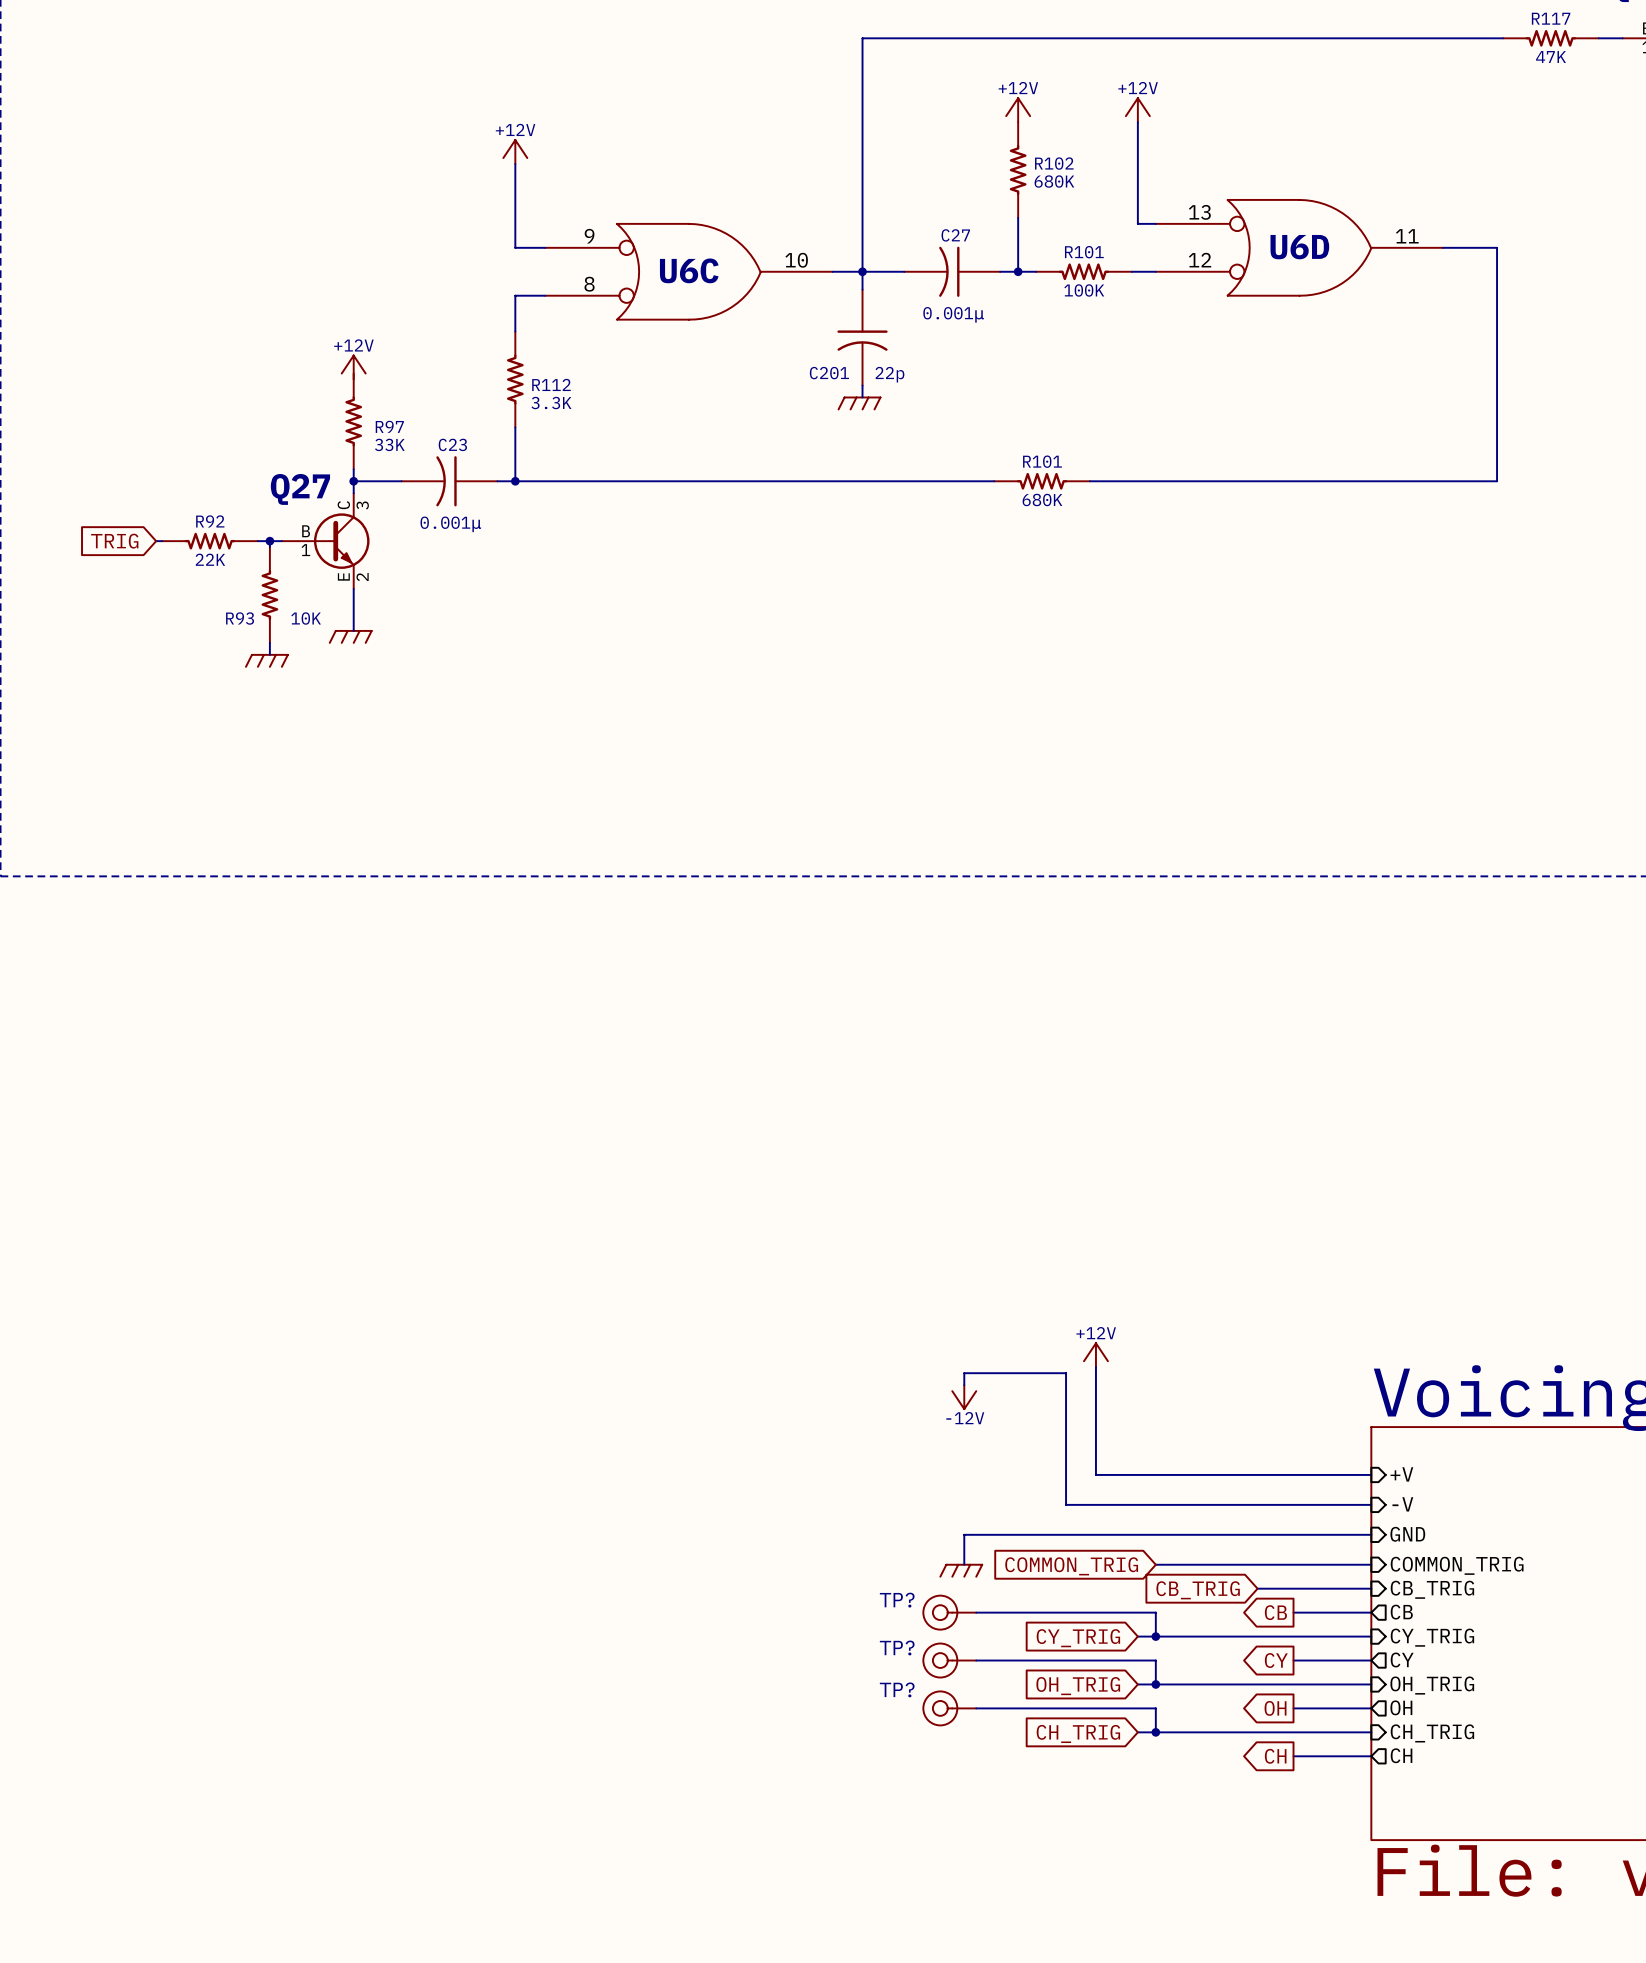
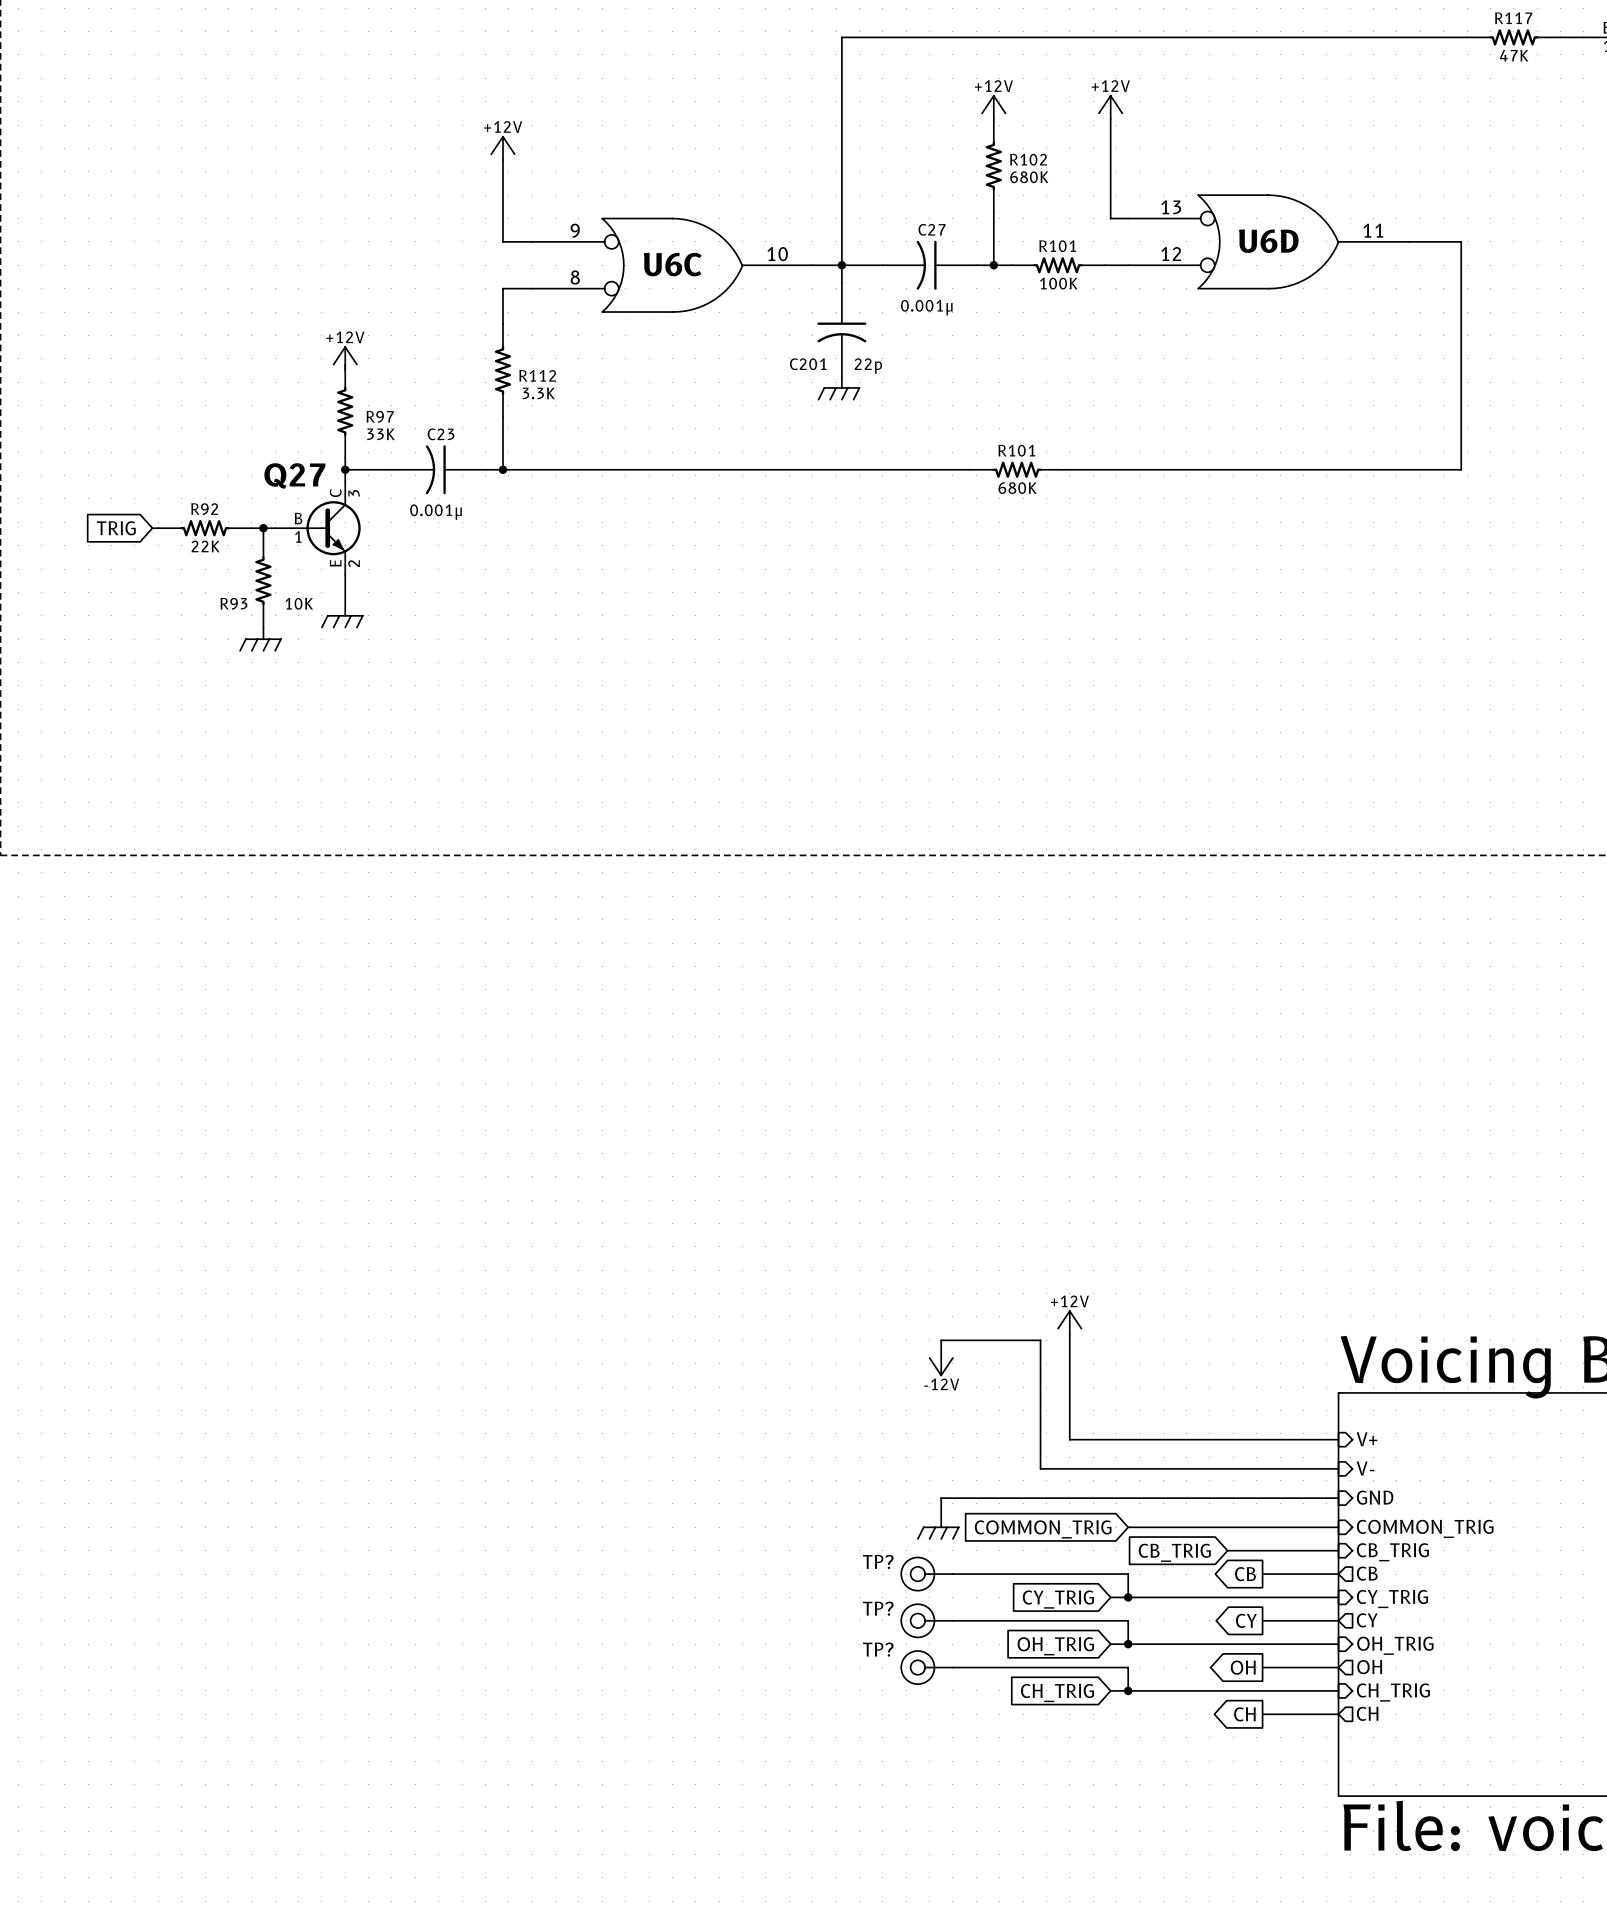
sheet pin: +V (1401, 1474) -> V+ (1366, 1439)
sheet pin: -V (1402, 1504) -> V- (1365, 1468)

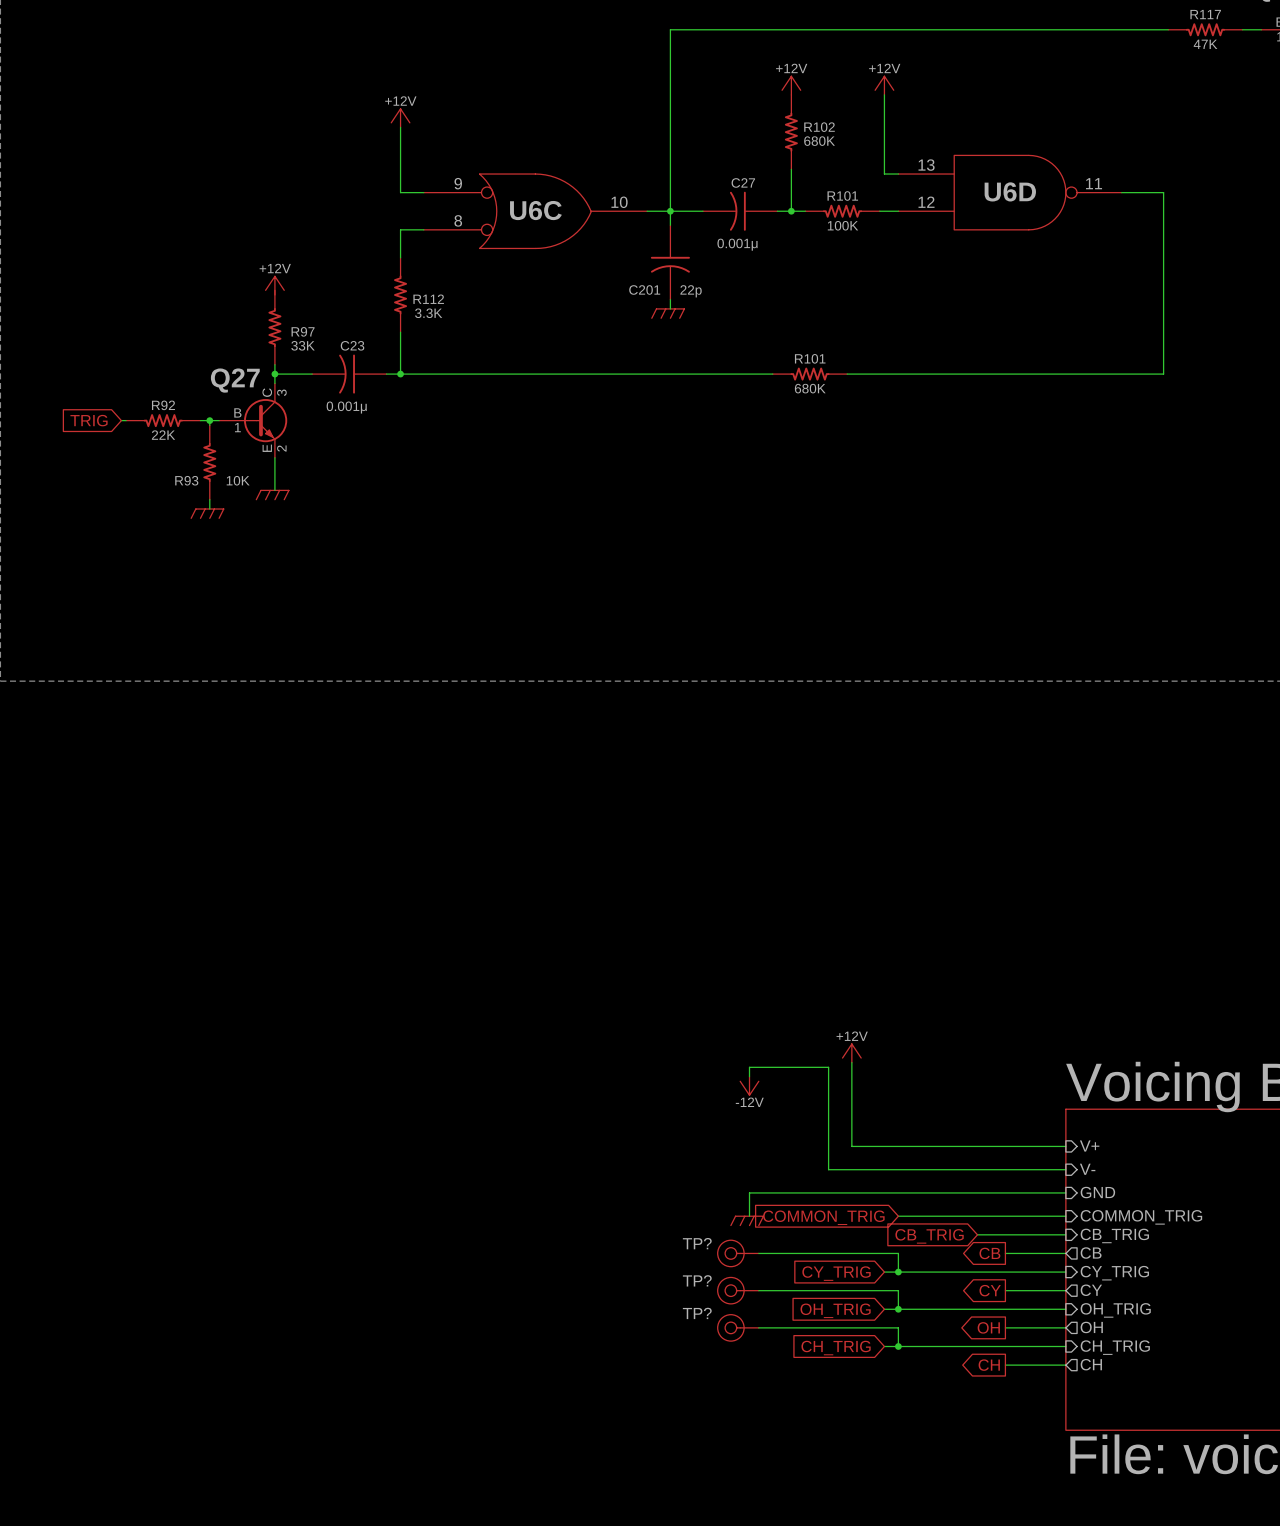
U6D symbol: [1128, 195, 1409, 289] -> [898, 155, 1122, 230]

